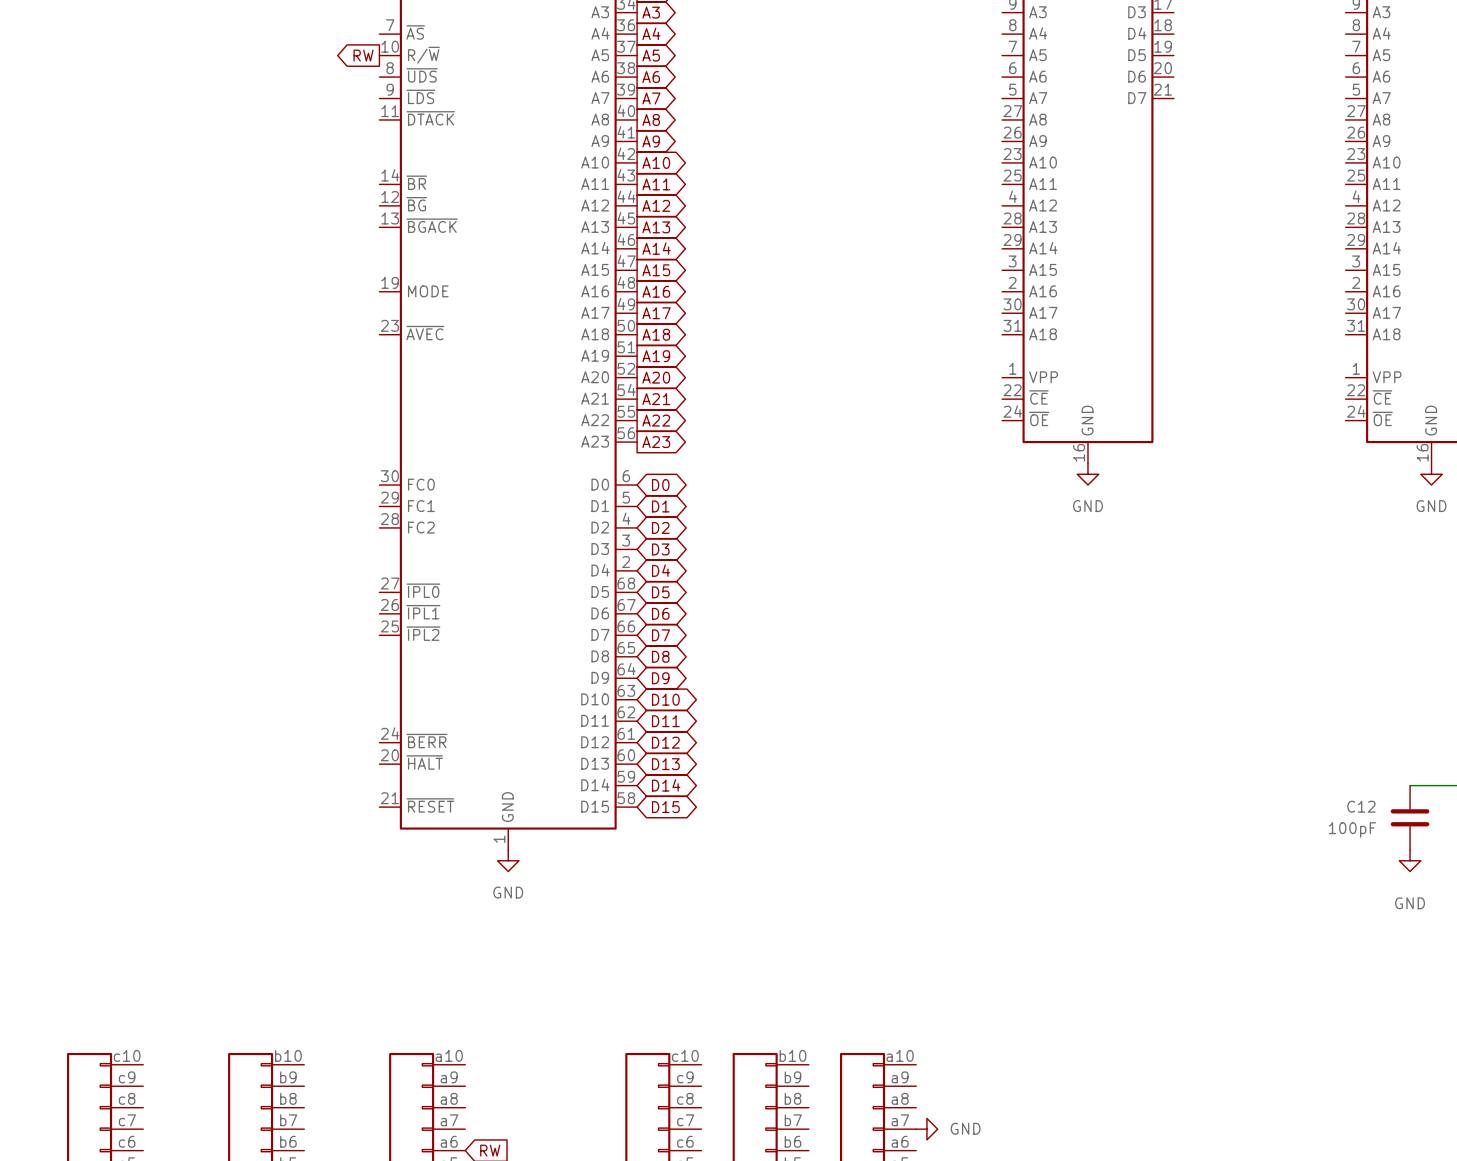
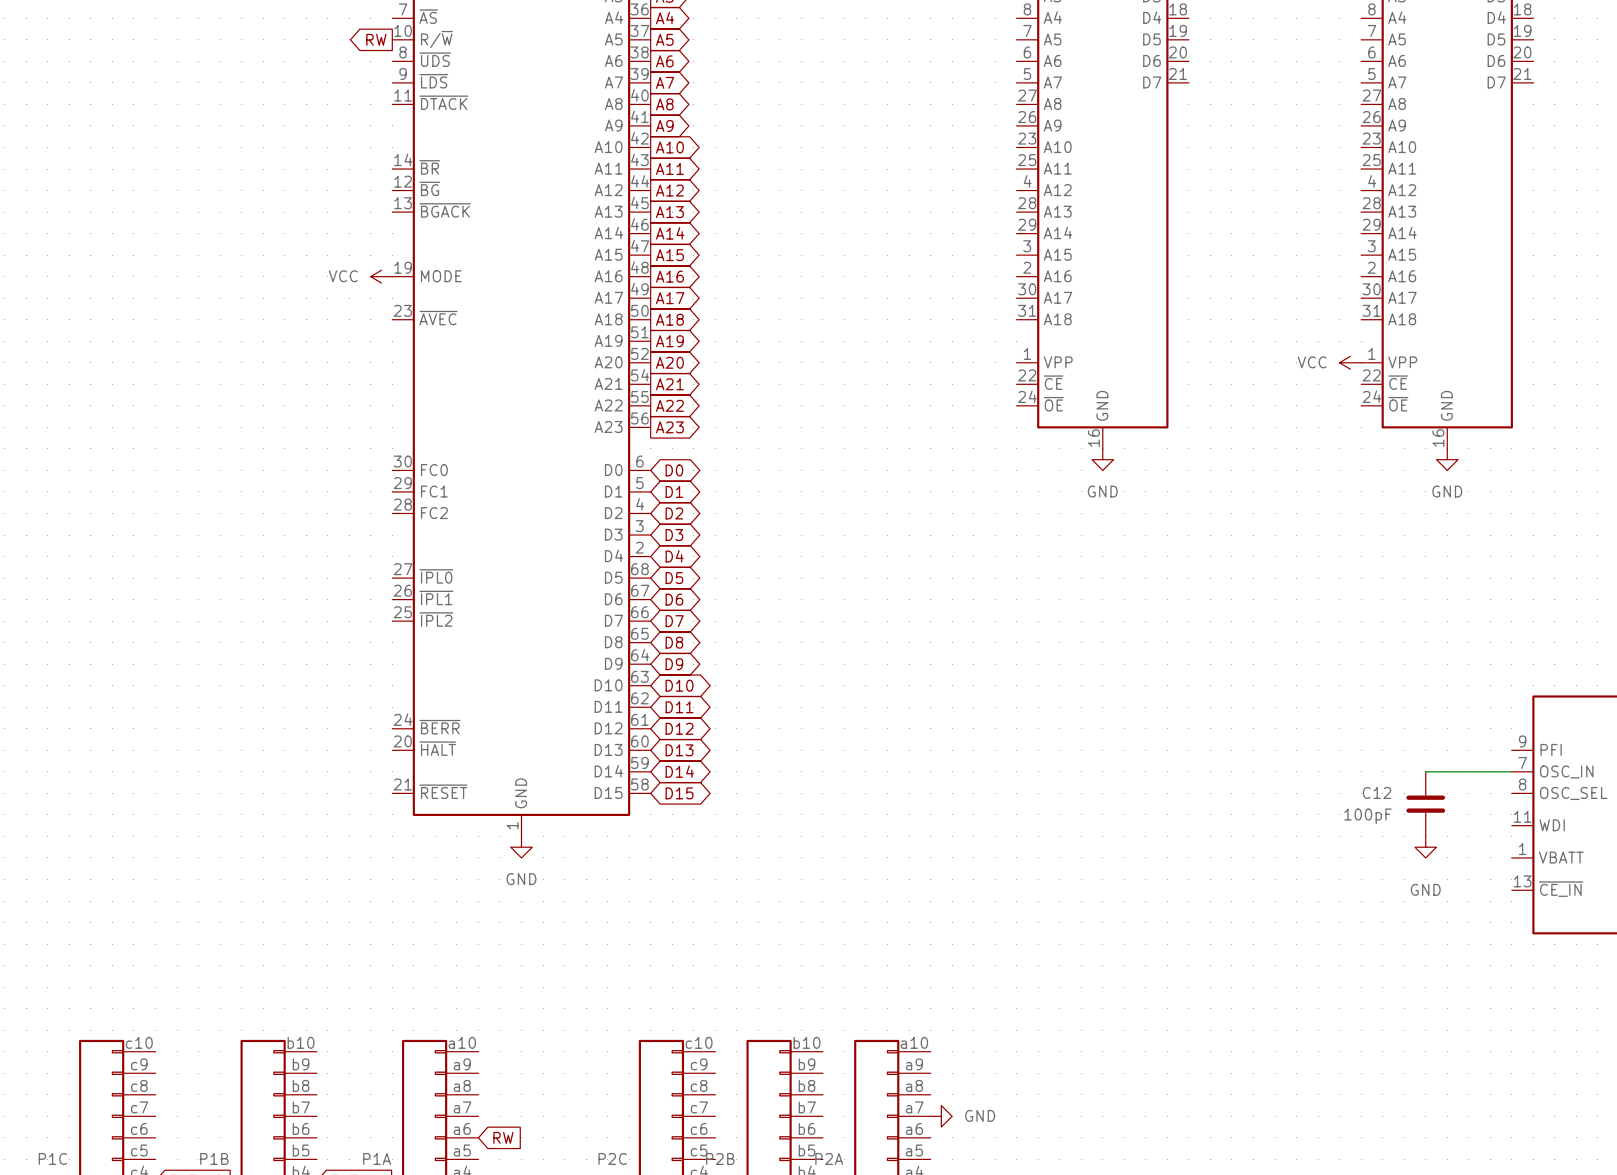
power symbol: none -> VCC (381, 276)
power symbol: none -> VCC (1350, 362)

